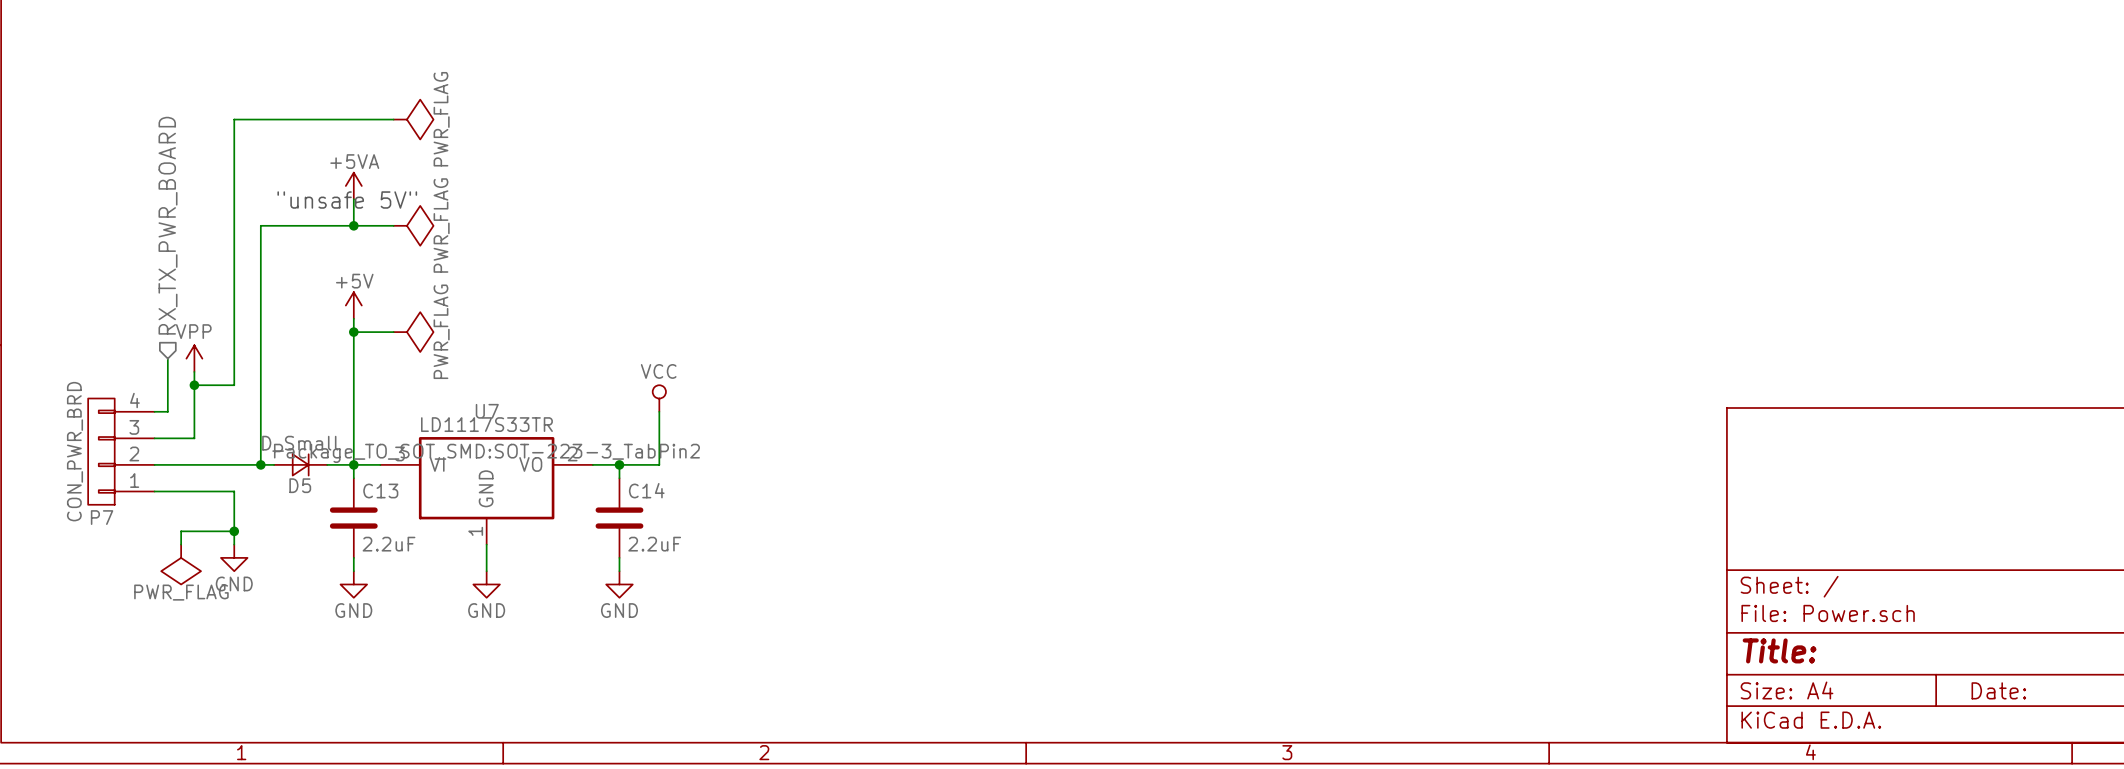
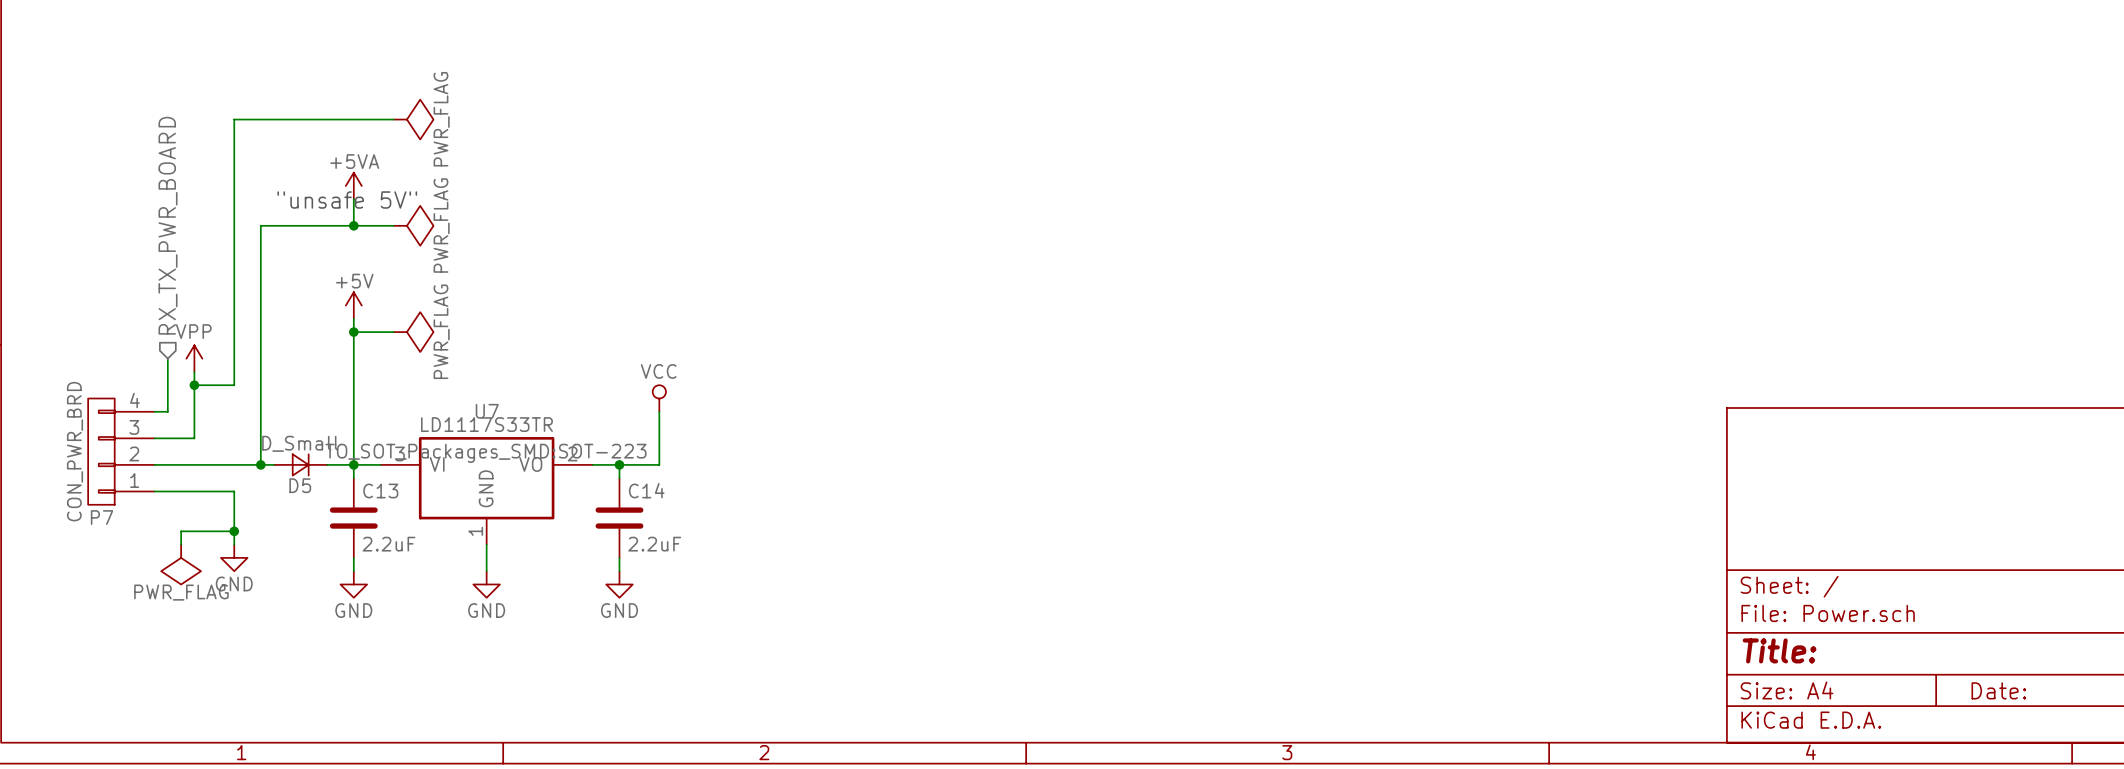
U7 text: Package_TO_SOT_SMD:SOT-223-3_TabPin2 (486, 453) -> TO_SOT_Packages_SMD:SOT-223 (486, 453)

